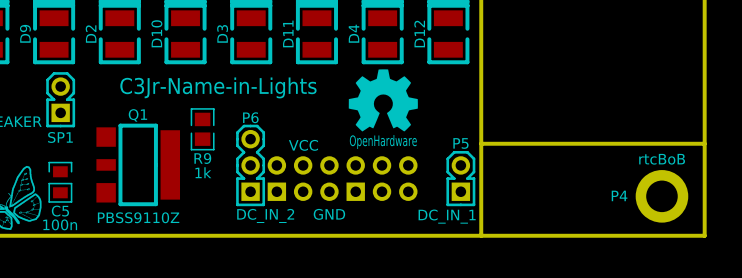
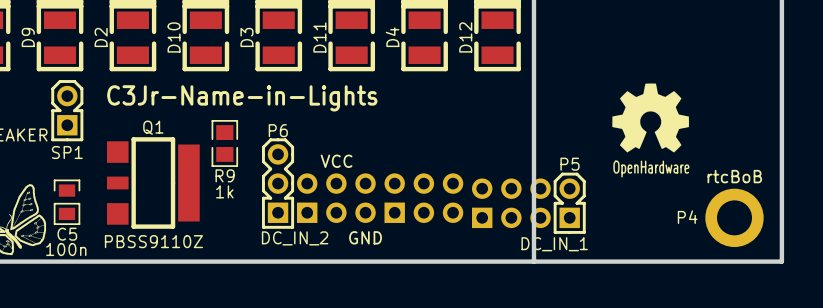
drawing position: (383, 100) -> (650, 117)
text position: OpenHardware (383, 142) -> OpenHardware (651, 169)
board edge: (481, 143) (704, 143) -> none
P5 position: (460, 178) -> (569, 203)
part: none -> (511, 203)

